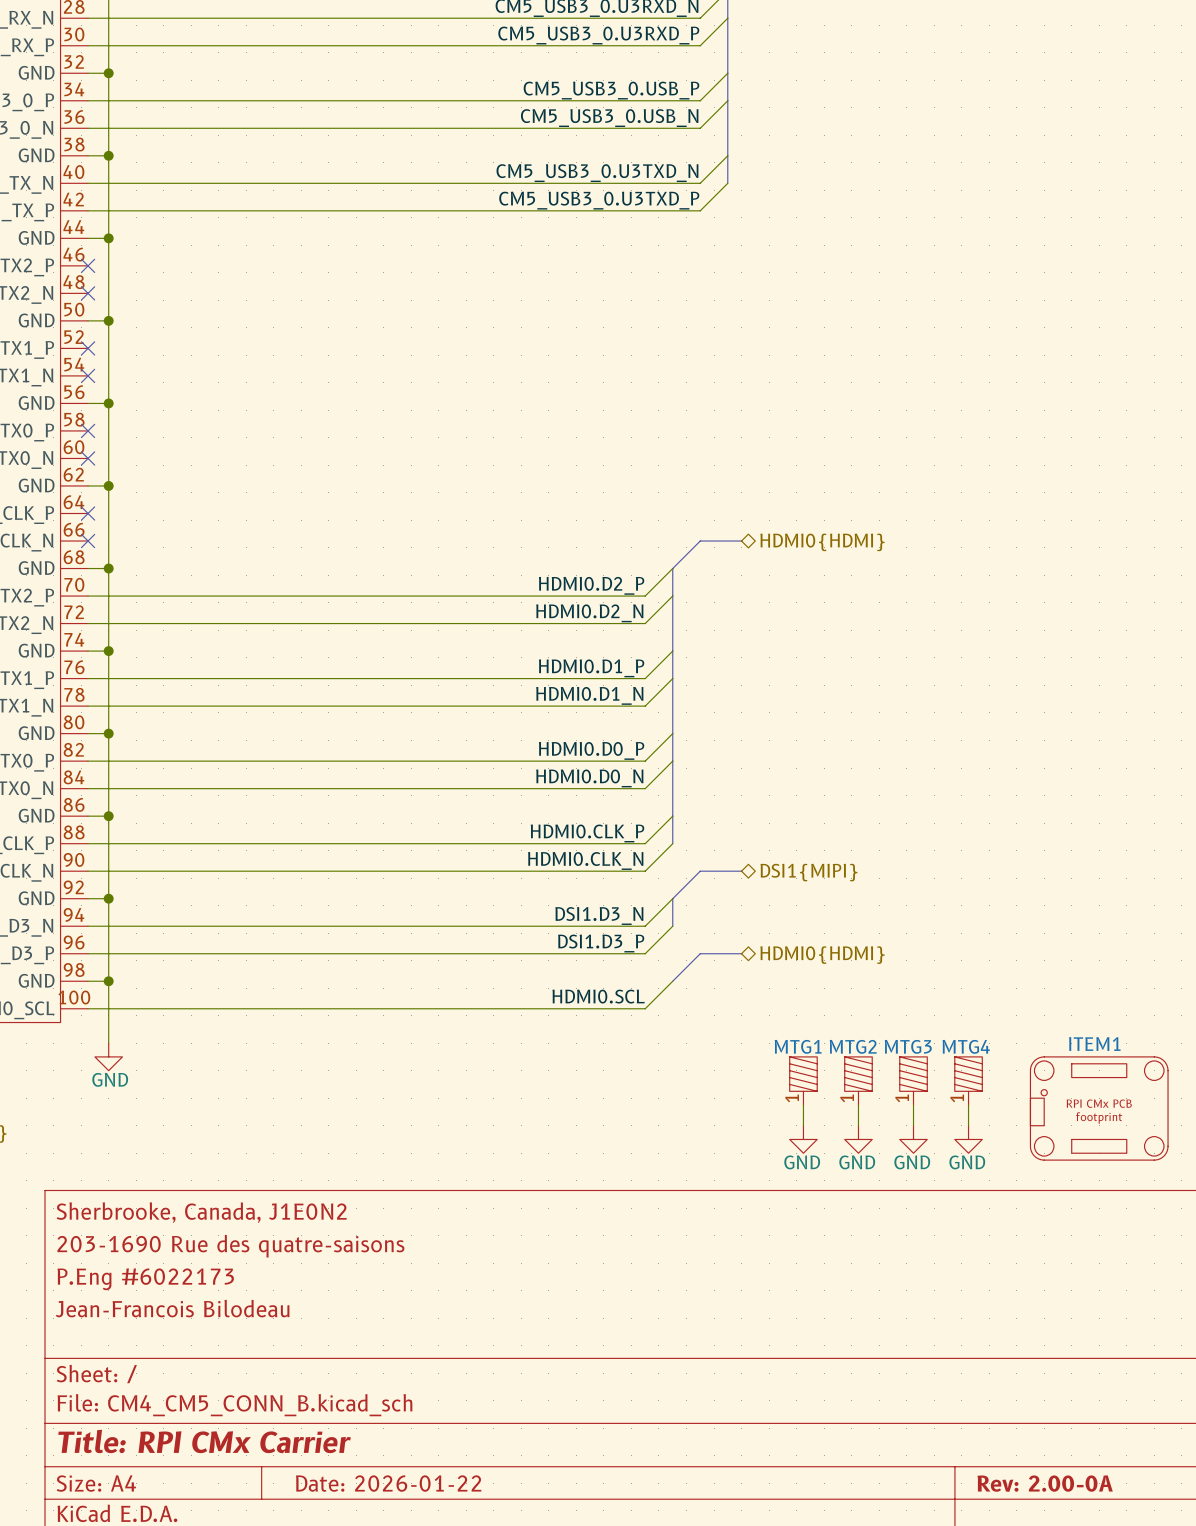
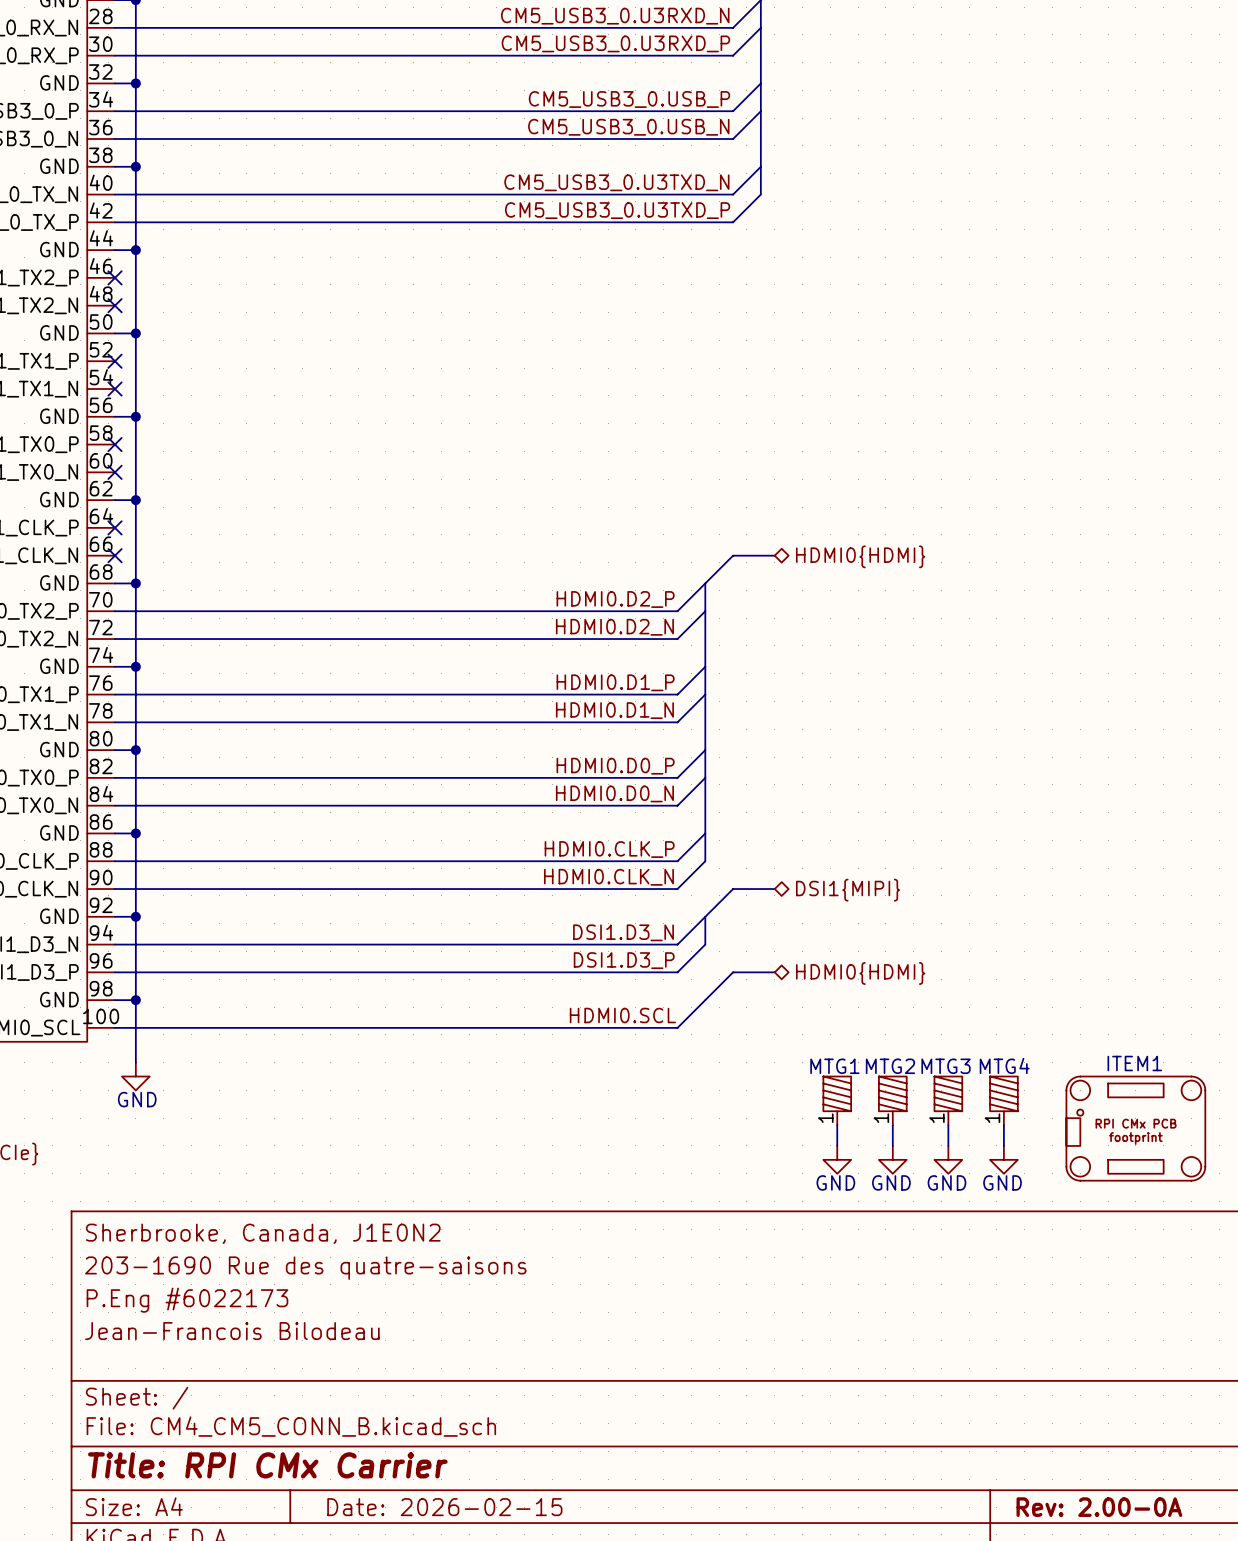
title block: Date: 2026-01-22 (388, 1483) -> Date: 2026-02-15 (444, 1507)

